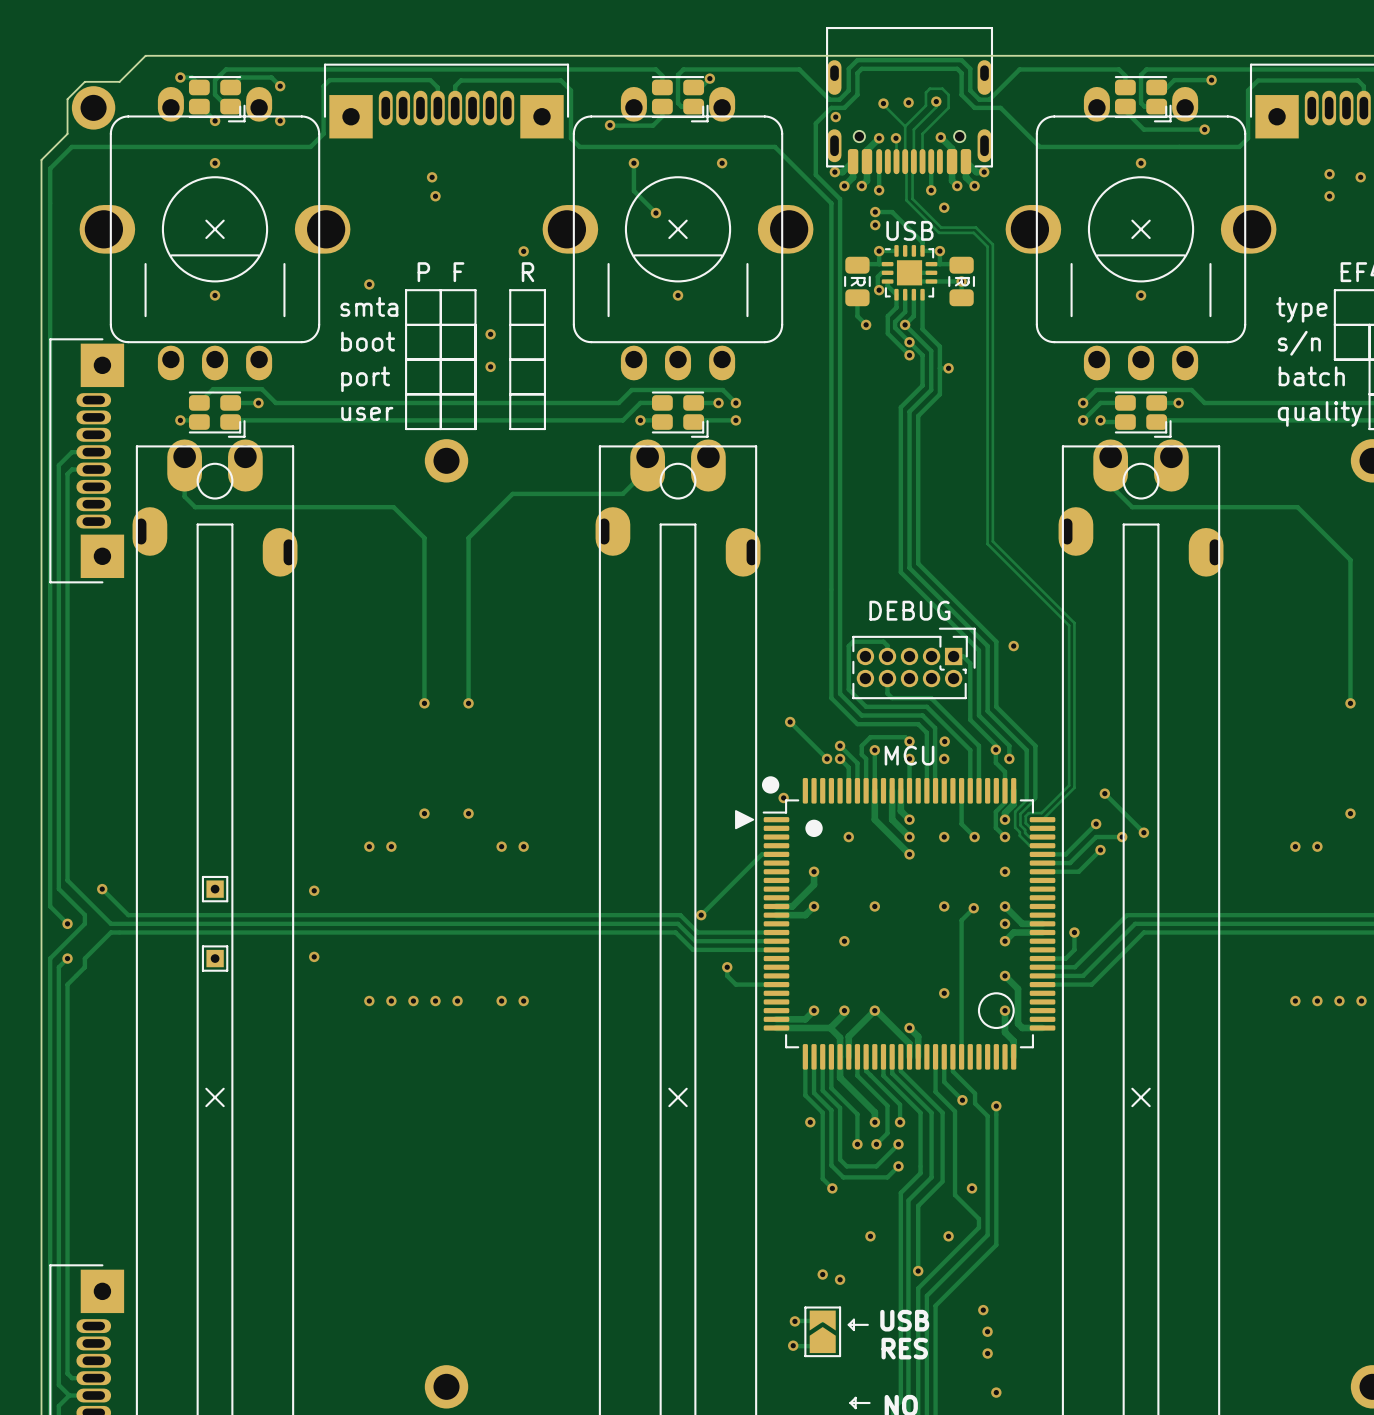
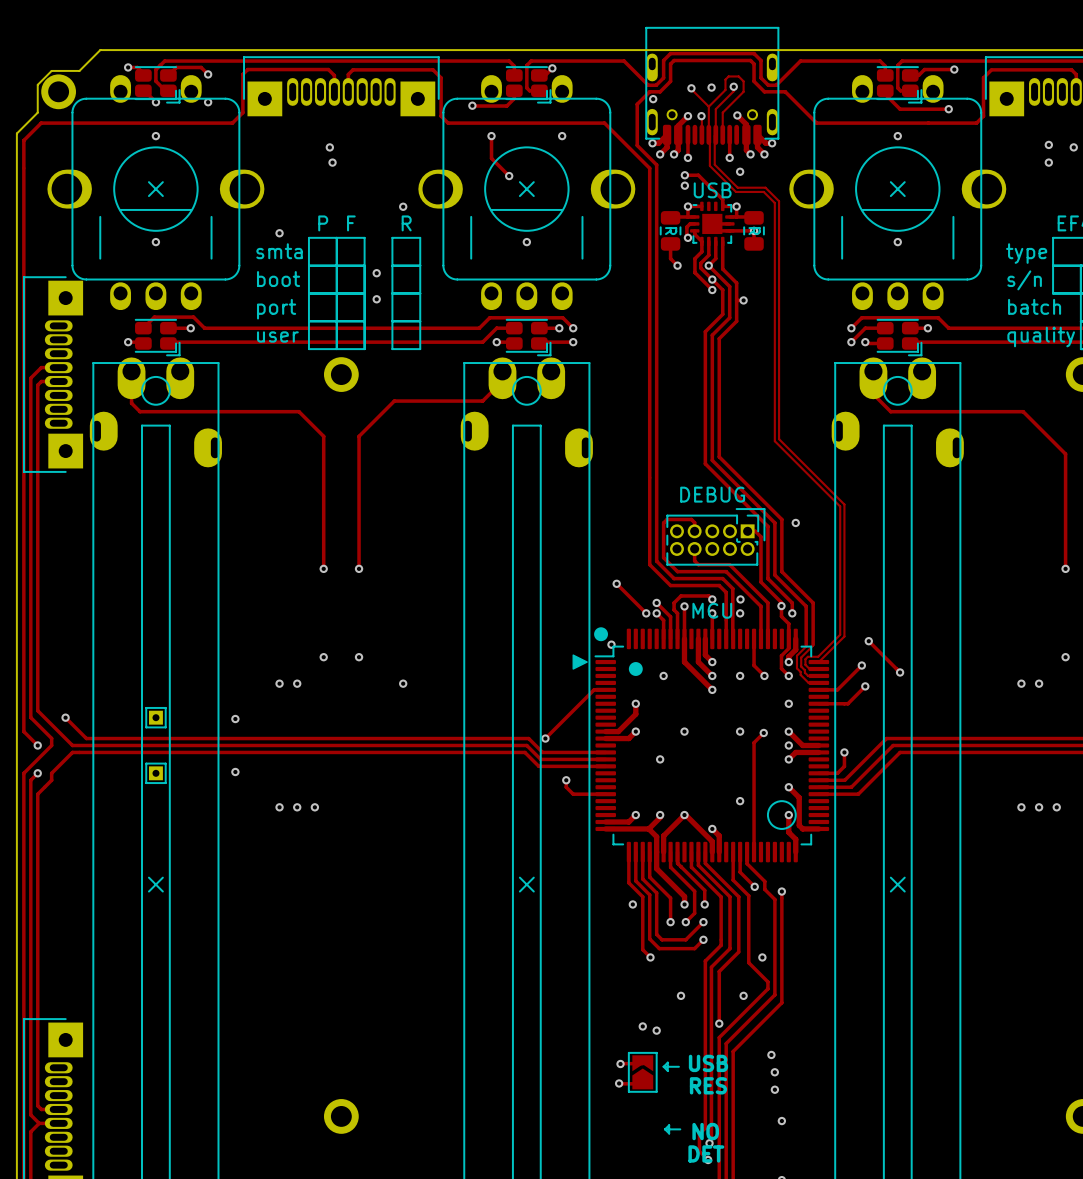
track: (1122, 837) (1096, 837) (1070, 863) (1042, 863) -> none
via: (1122, 837) -> none
via: (501, 846) -> none
via: (435, 1001) -> none
via: (457, 1001) -> none
via: (501, 1001) -> none
via: (523, 1001) -> none
via: (1361, 1001) -> none

